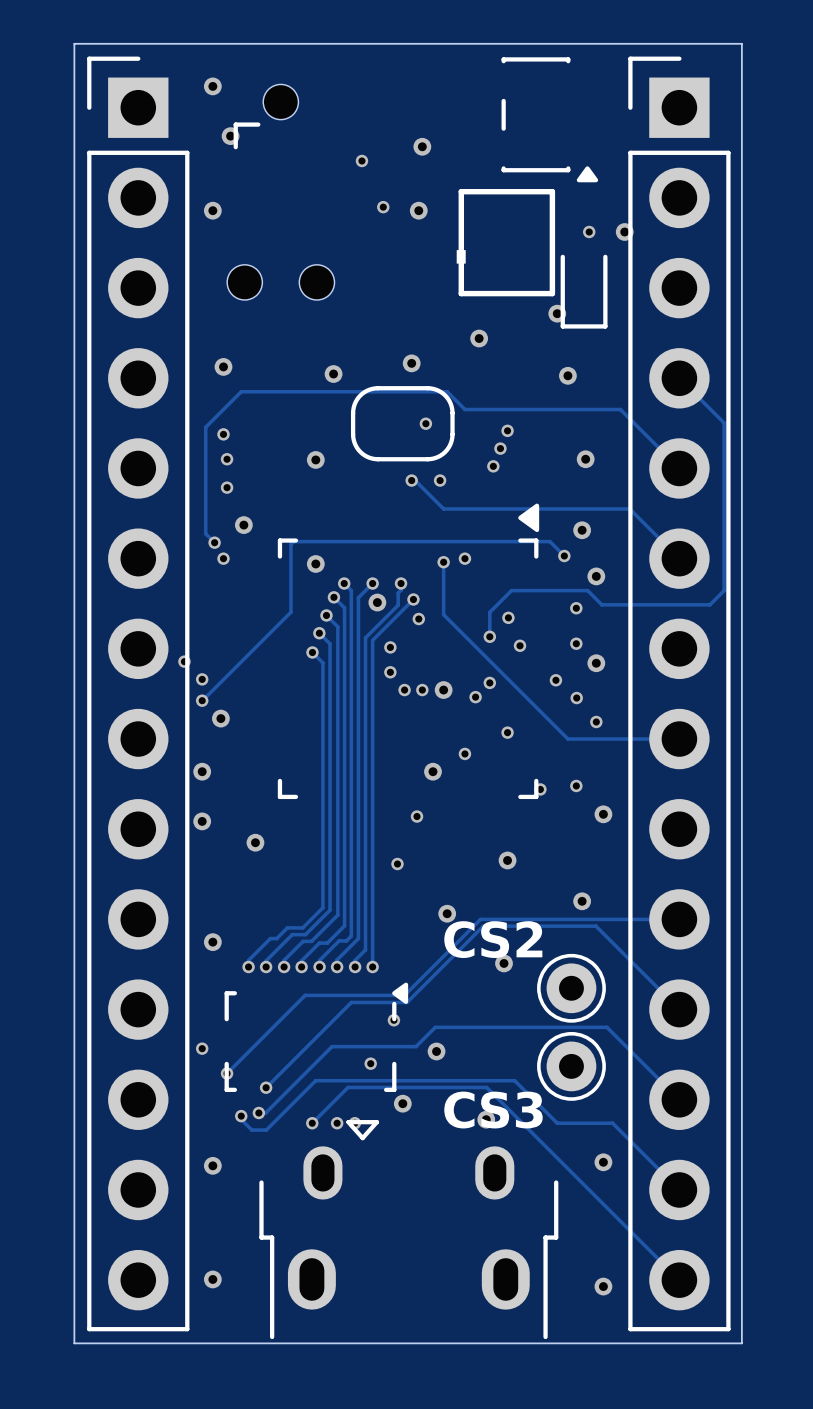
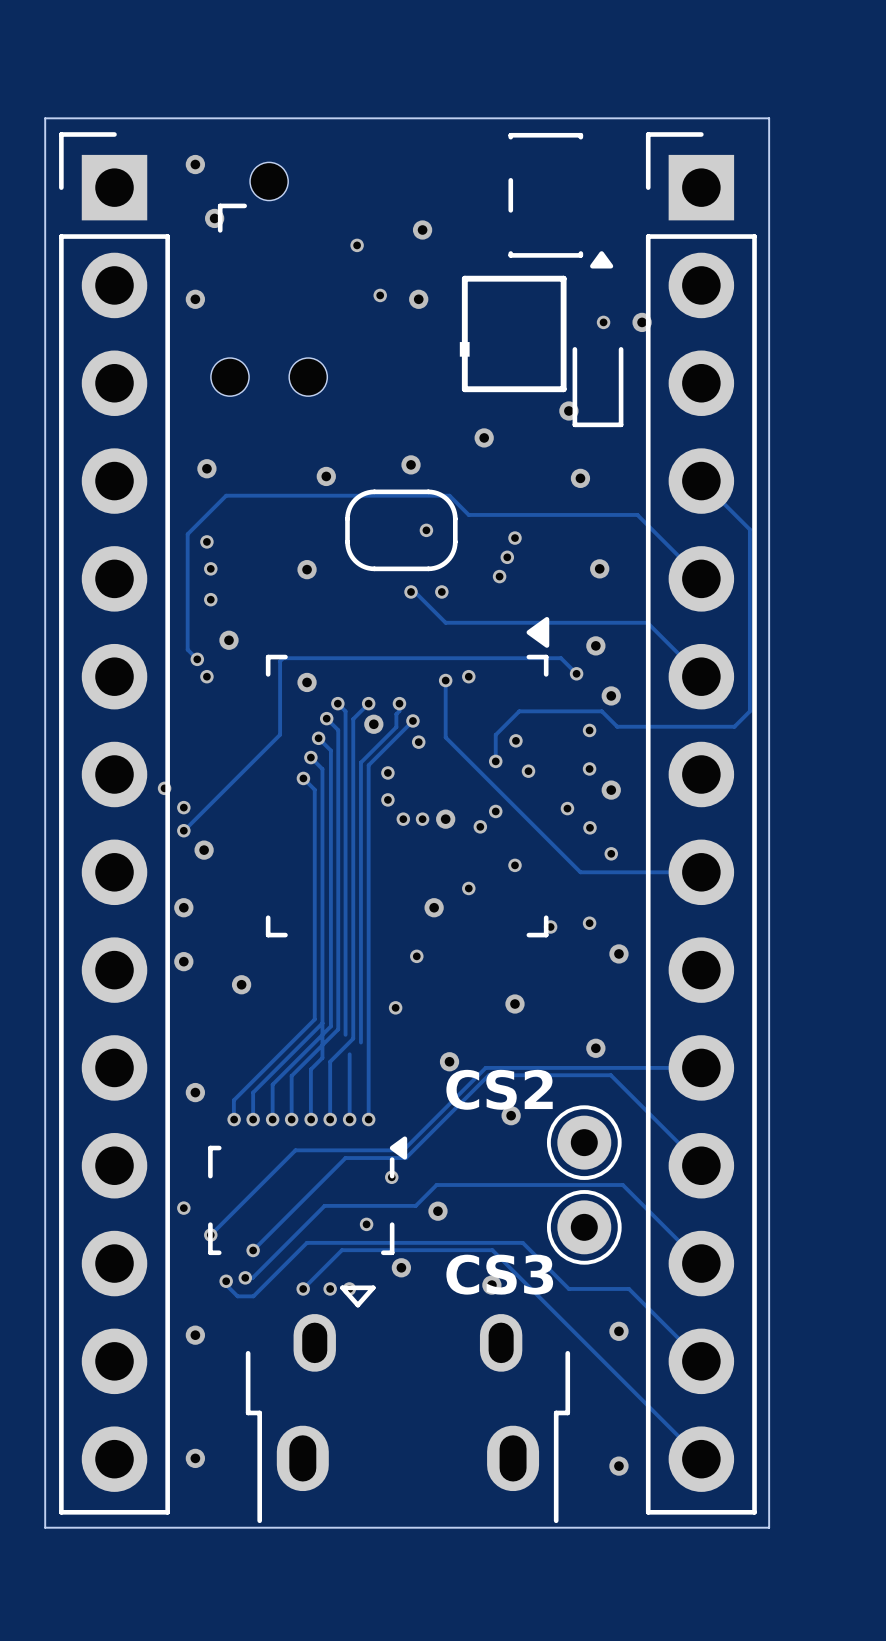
track: (322, 874) (322, 907) (302, 927) (287, 927) (276, 938) (270, 938) (248, 960) (248, 966) -> (314, 1019) (233, 1100) (233, 1119)
track: (337, 881) (337, 915) (311, 941) (303, 941) (284, 960) -> (330, 1026) (272, 1084) (272, 1112)
track: (344, 883) (344, 925) (327, 943) (319, 943) (301, 960) -> (338, 1029) (291, 1075) (291, 1112)
track: (351, 888) (351, 936) (346, 940) (339, 940) (319, 960) (319, 966) -> (310, 1069) (310, 1119)
track: (358, 892) (358, 938) (337, 959) -> (353, 1038) (330, 1061) (330, 1111)
track: (365, 895) (365, 949) (355, 960) -> (349, 1054) (349, 1112)
track: (319, 920) (305, 934) (292, 934) (266, 960) -> (322, 1023) (253, 1092) (253, 1112)

